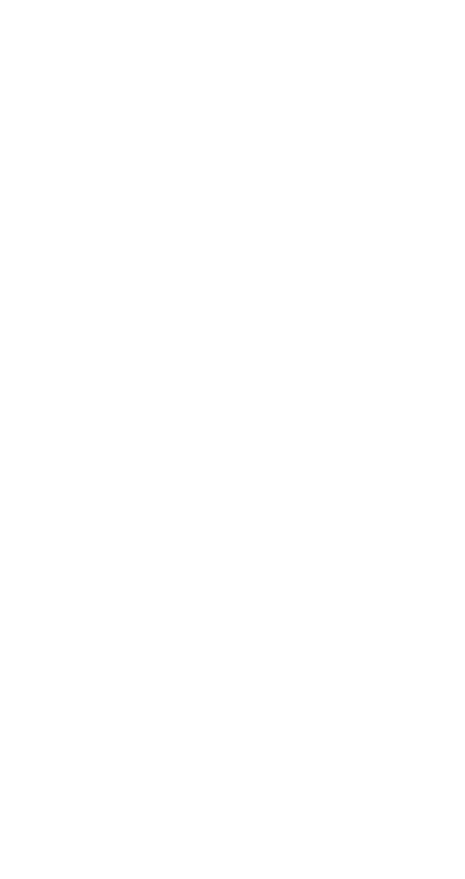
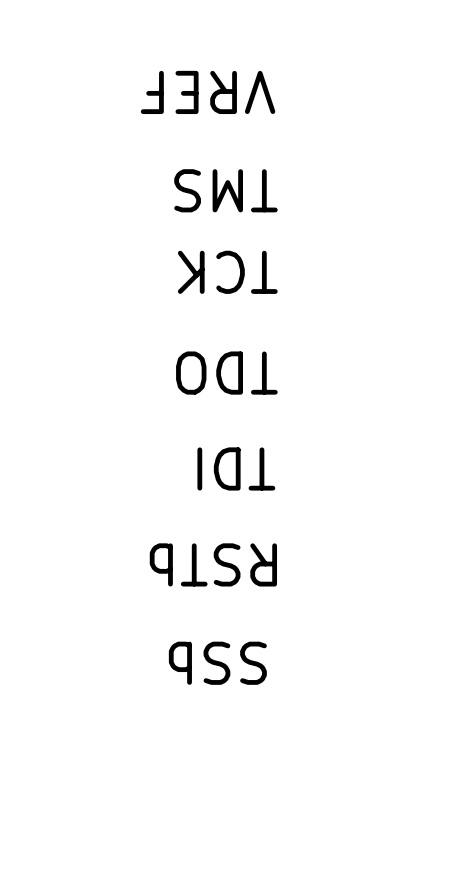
text: none -> VREF (208, 92)
text: none -> TMS (225, 190)
text: none -> TCK (227, 272)
text: none -> TDO (226, 373)
text: none -> TDI (236, 468)
text: none -> RSTb (213, 564)
text: none -> SSb (217, 663)

